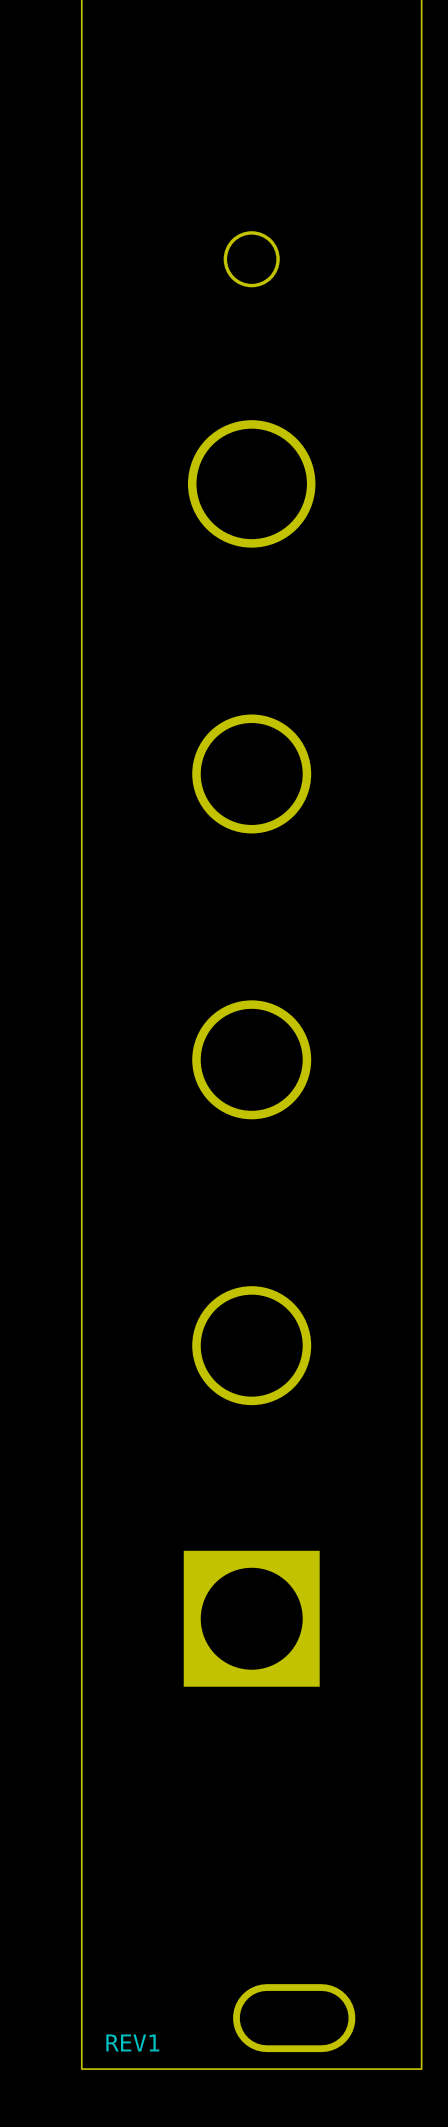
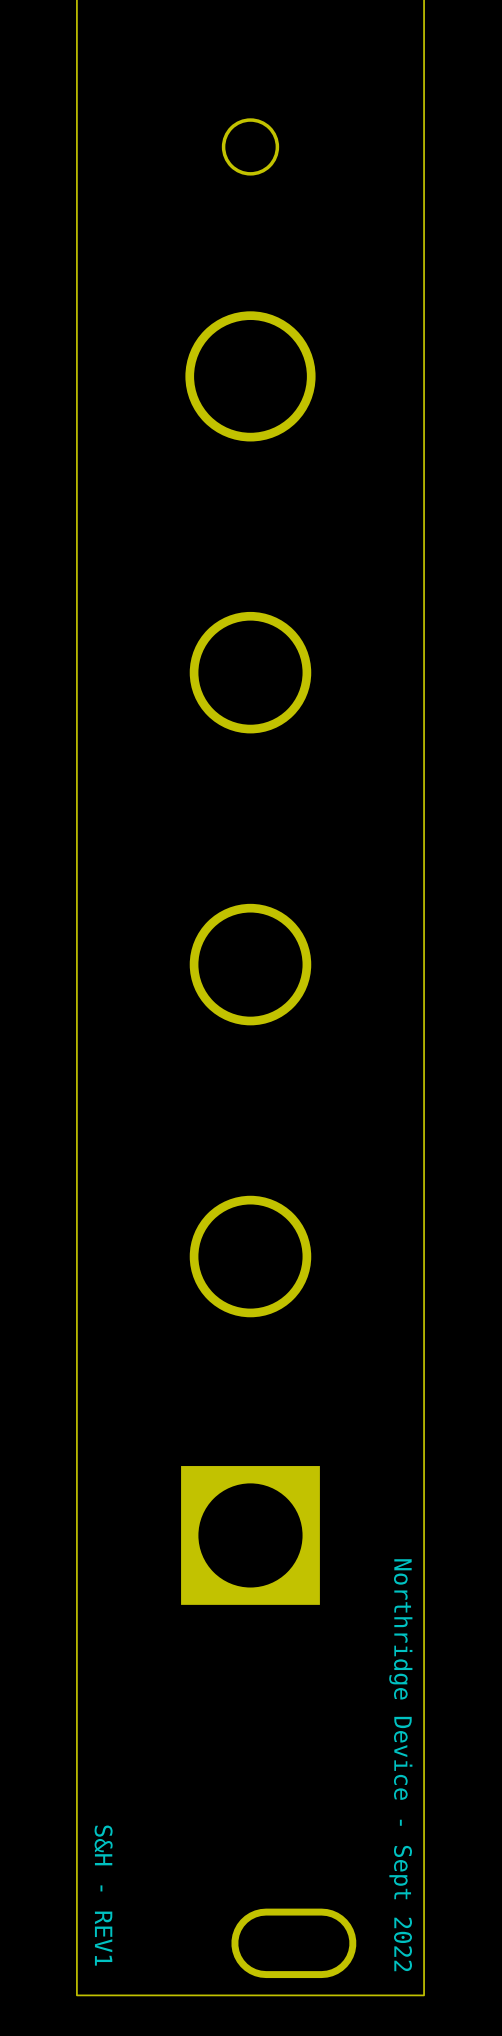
text: none -> Northridge Device - Sept 2022 (400, 1765)
text: none -> S&H - REV1 (103, 1895)
text: REV1 (132, 2042) -> none

